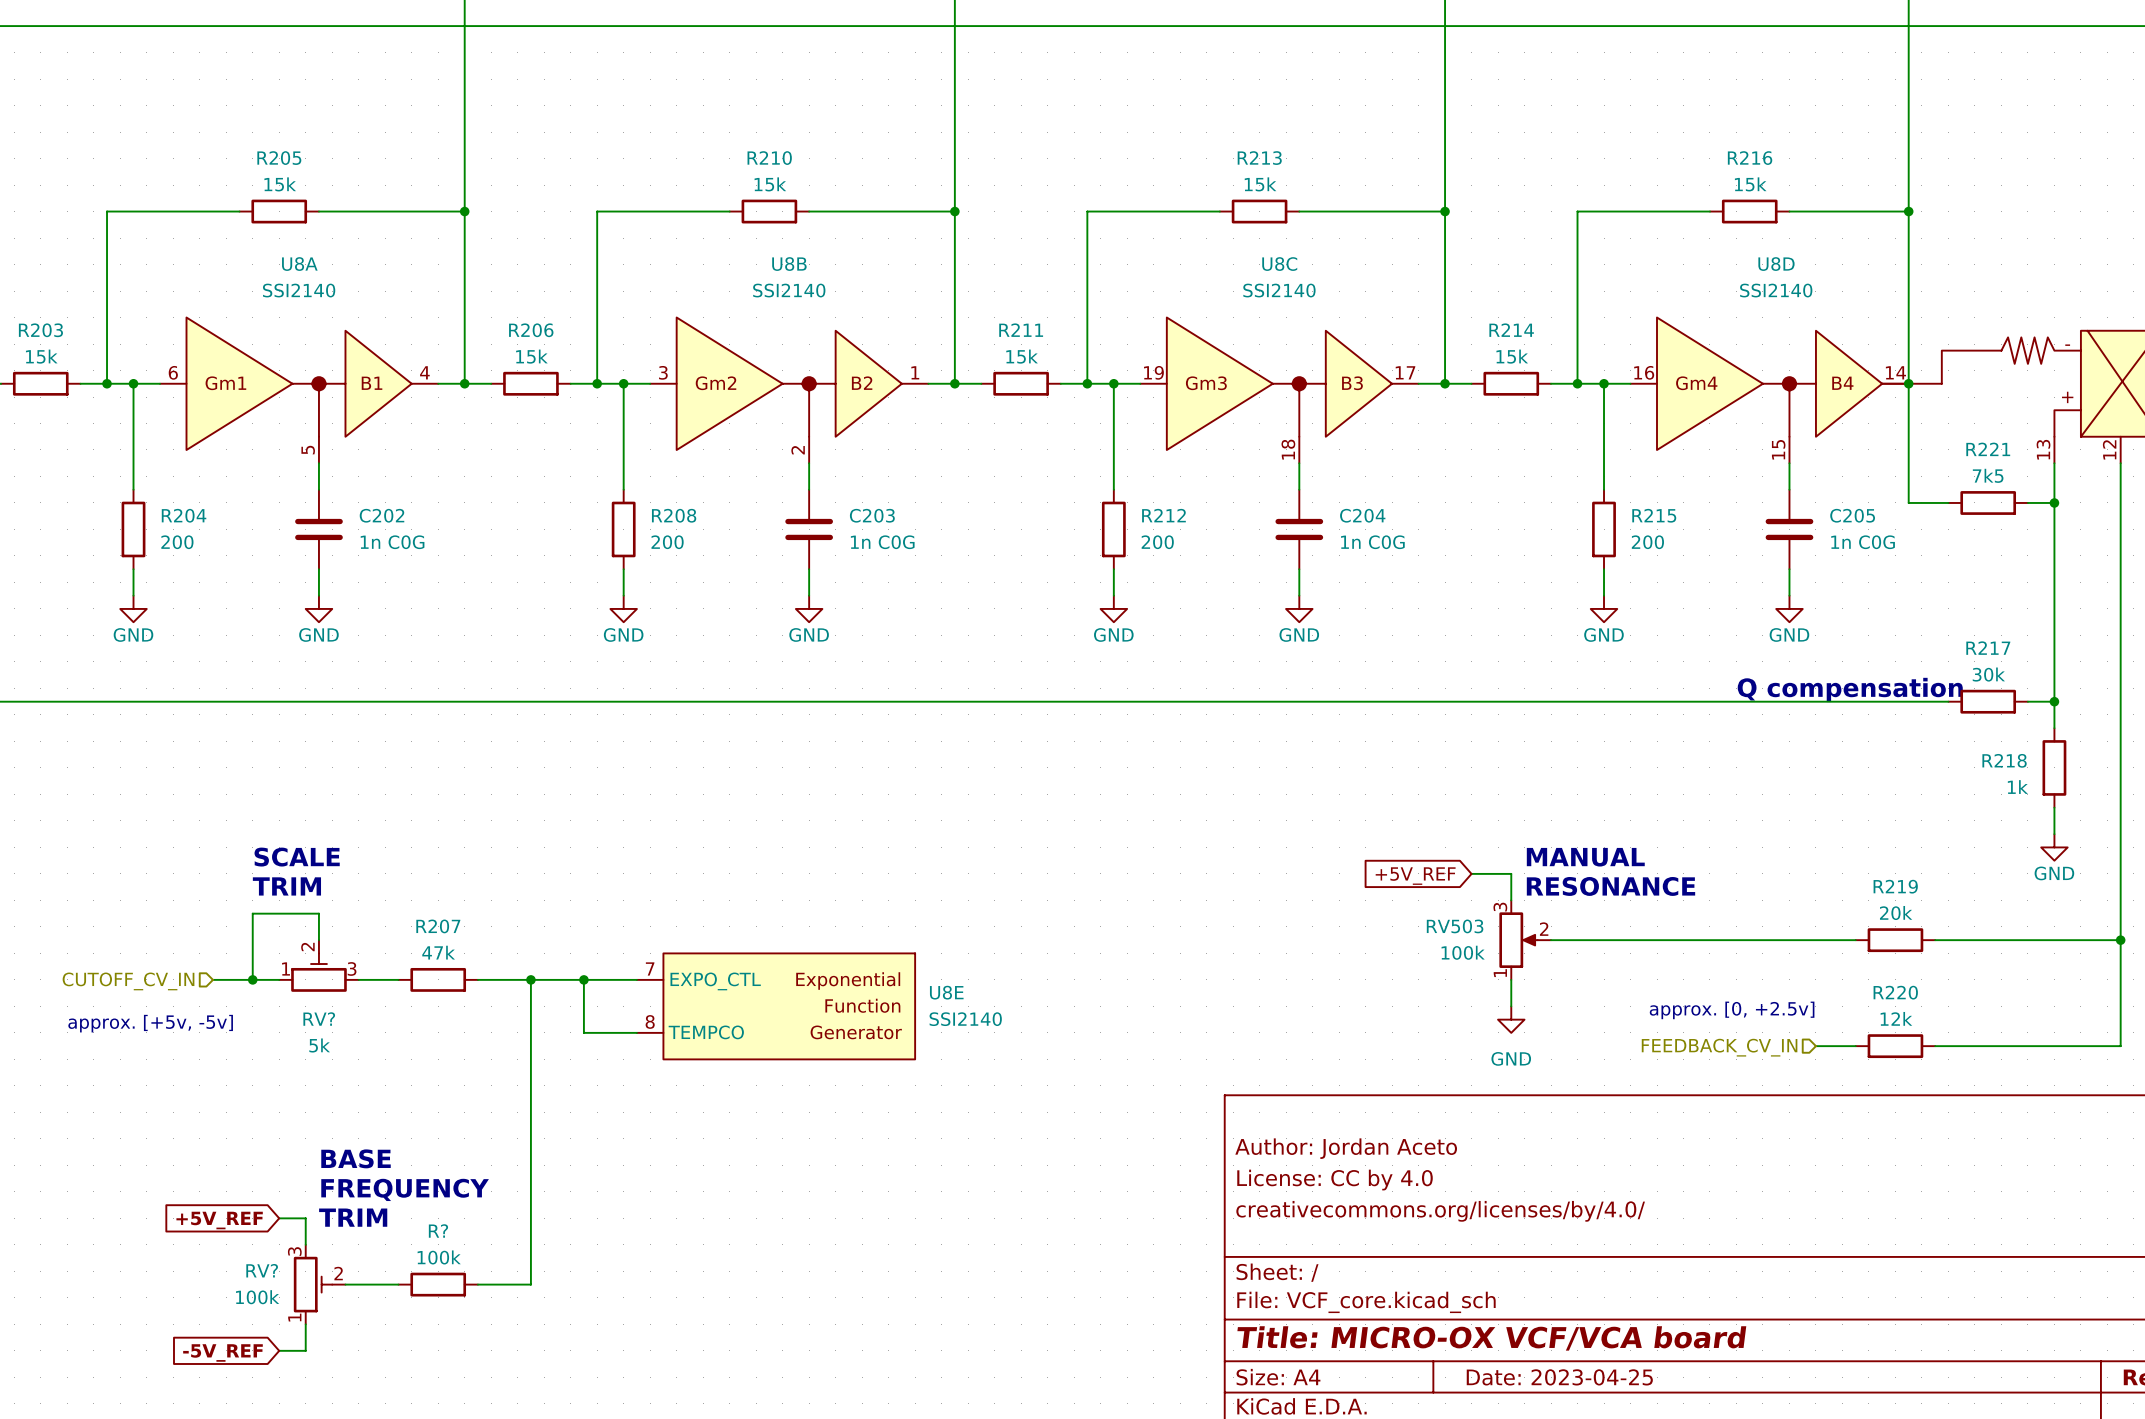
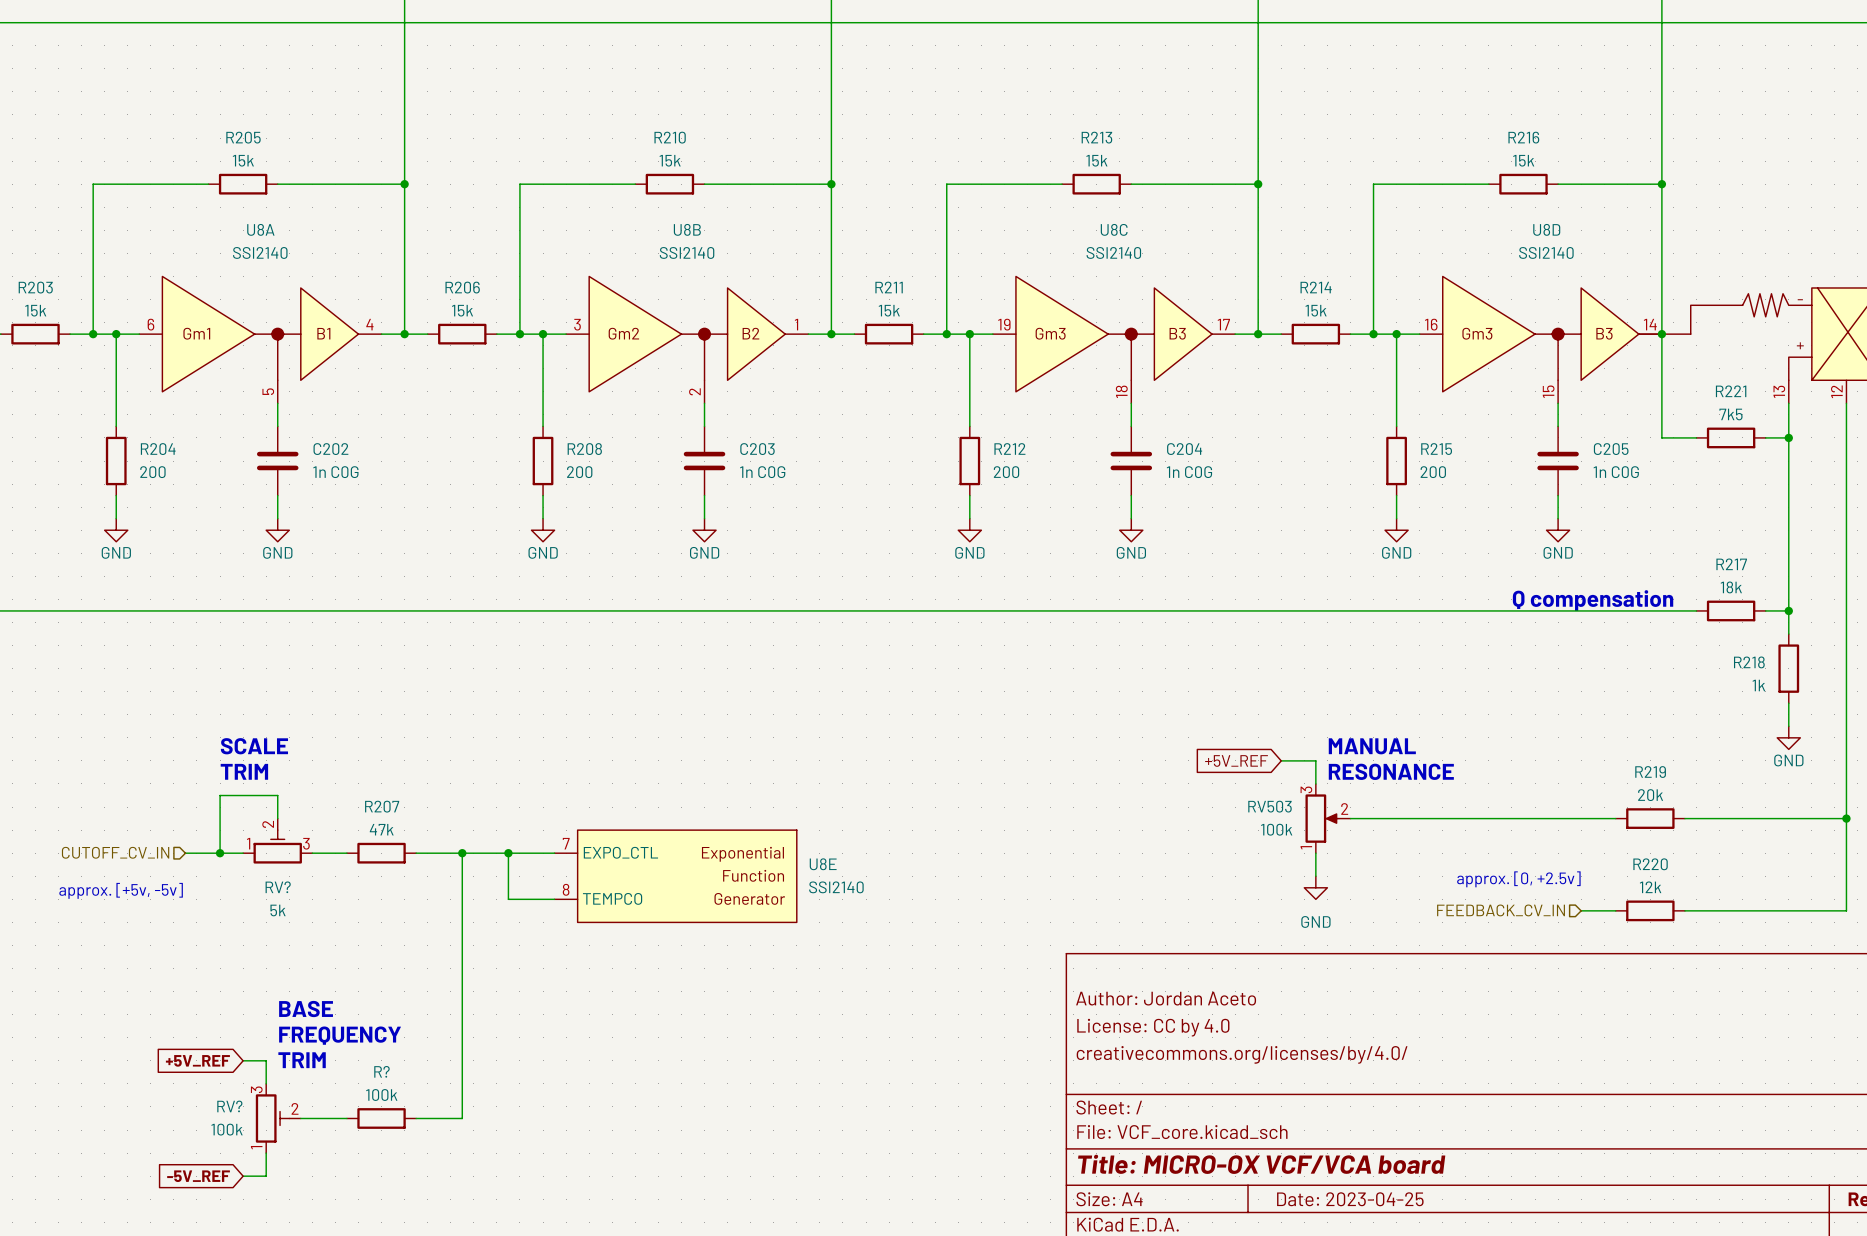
U8D text: Gm4 (1696, 383) -> Gm3 (1477, 333)
U8D text: B4 (1842, 383) -> B3 (1604, 333)
R217 value: 30k (1988, 674) -> 18k (1731, 587)

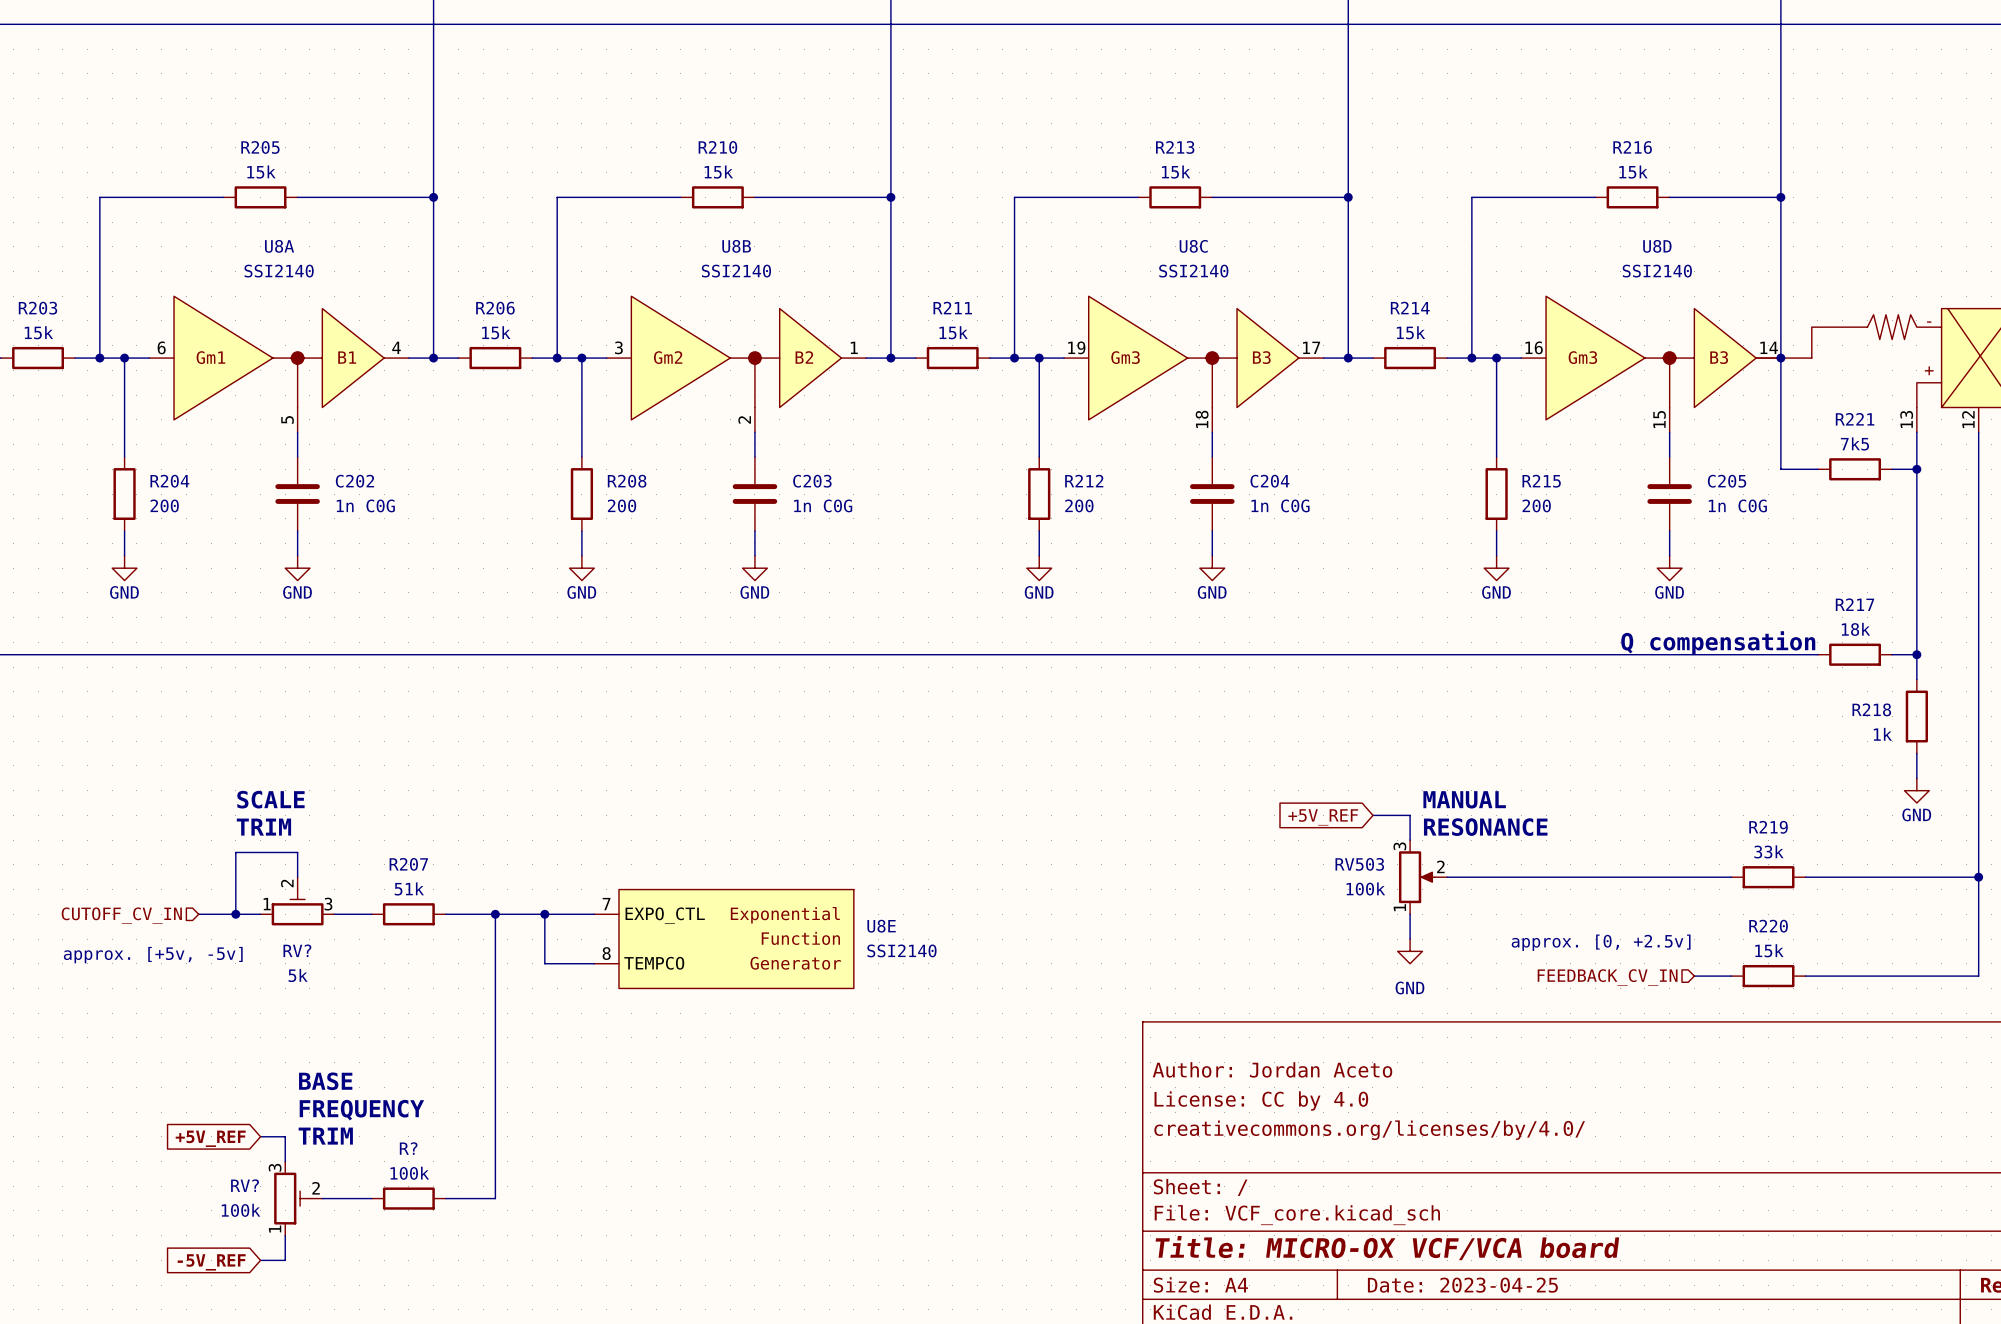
R219 value: 20k (1650, 795) -> 33k (1768, 851)
R207 value: 47k (381, 829) -> 51k (409, 888)
R220 value: 12k (1650, 887) -> 15k (1769, 950)

